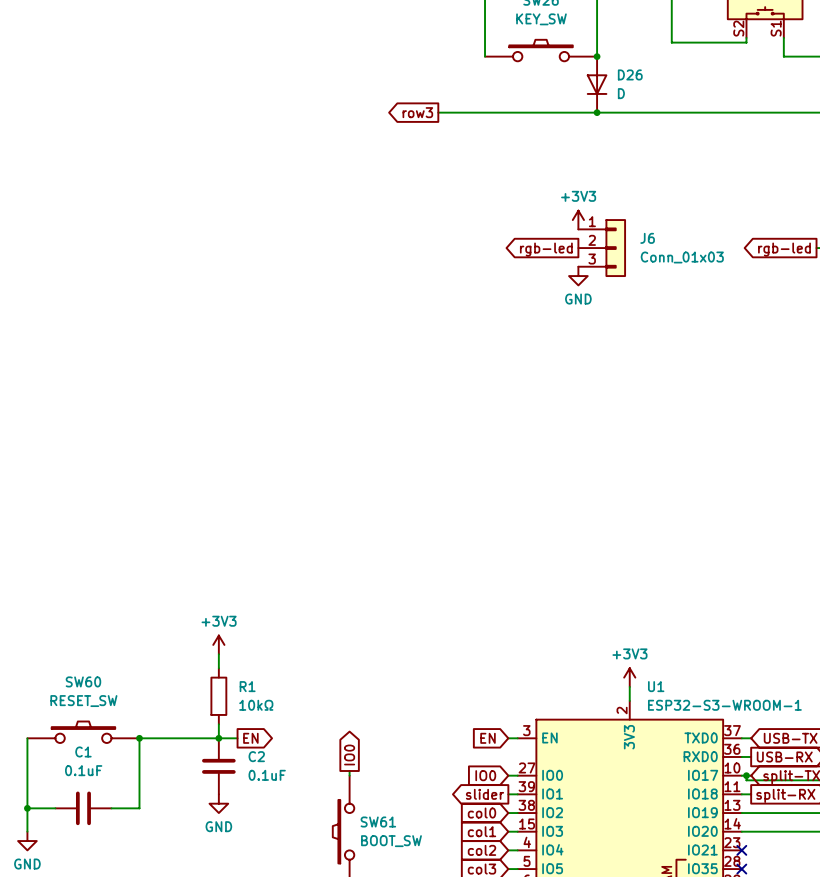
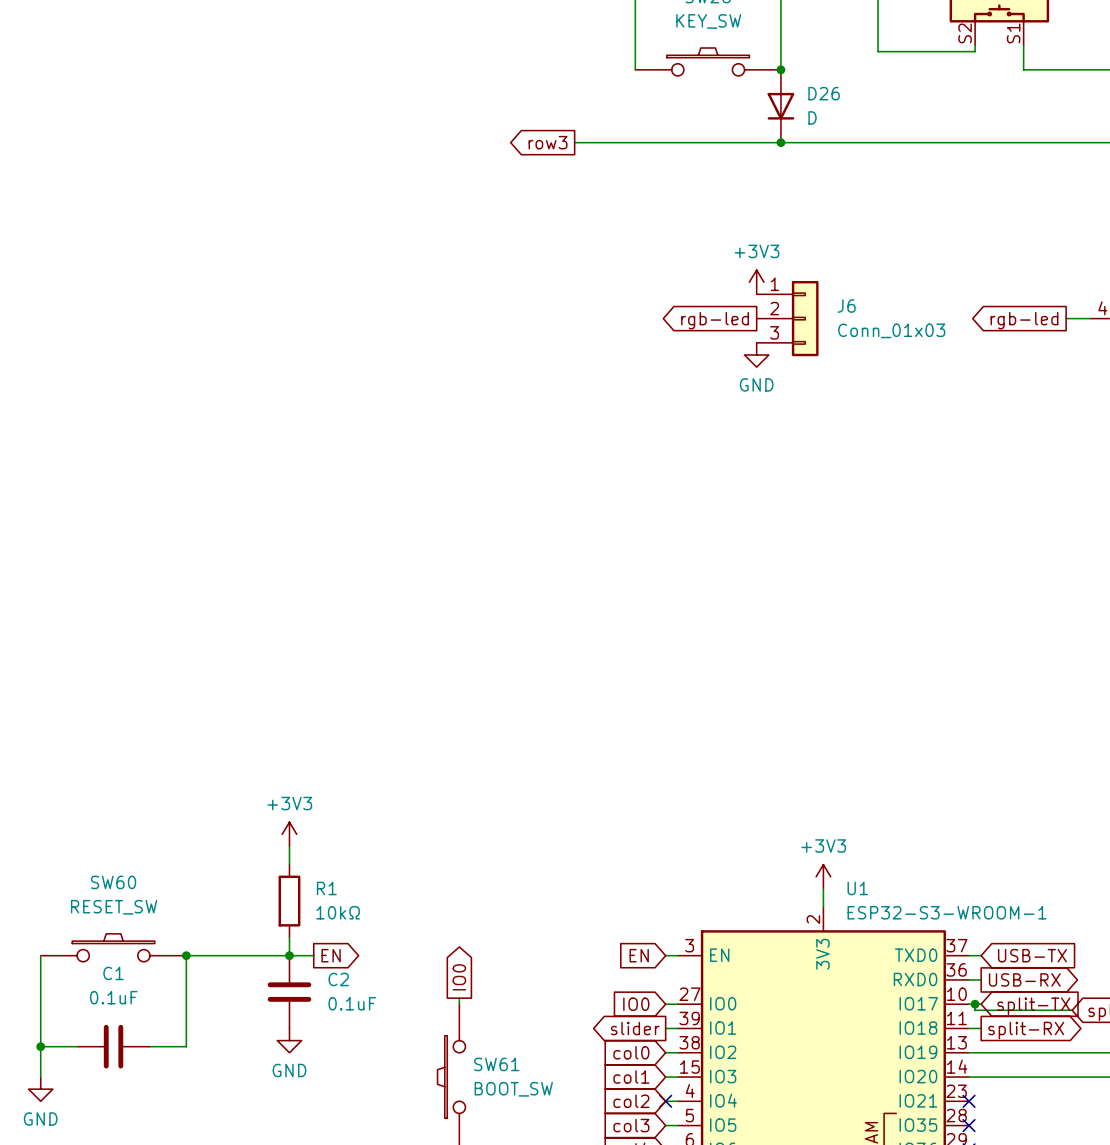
no-connect mark: none -> (665, 1101)

